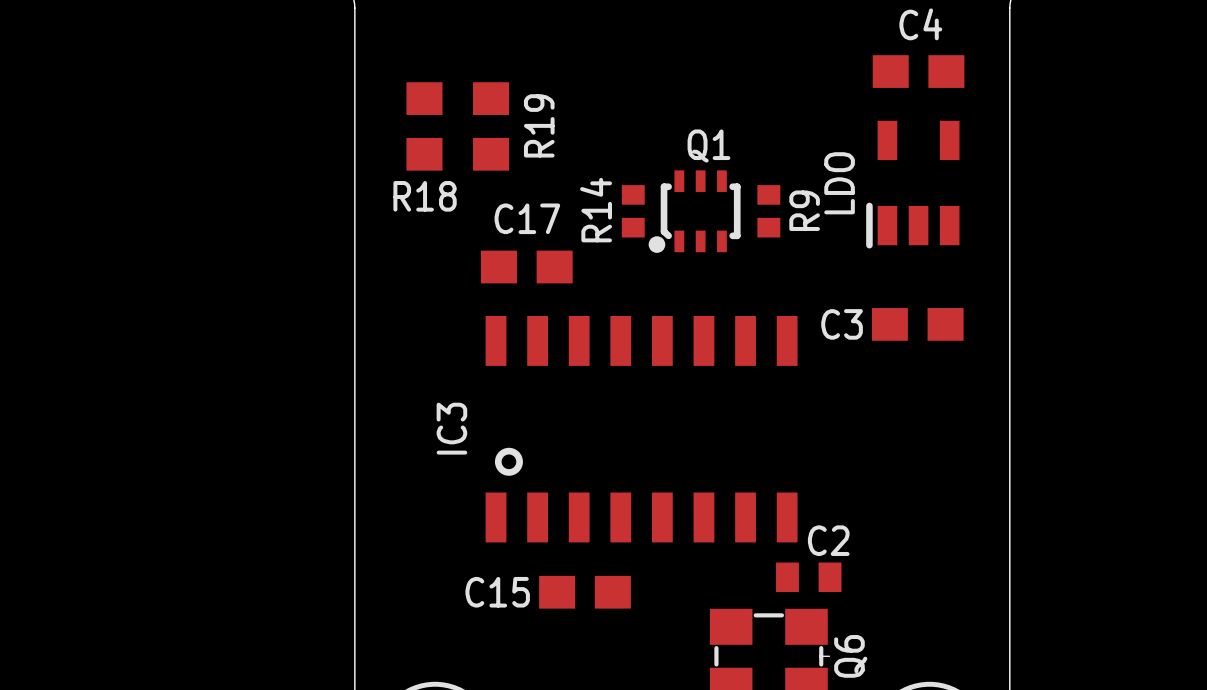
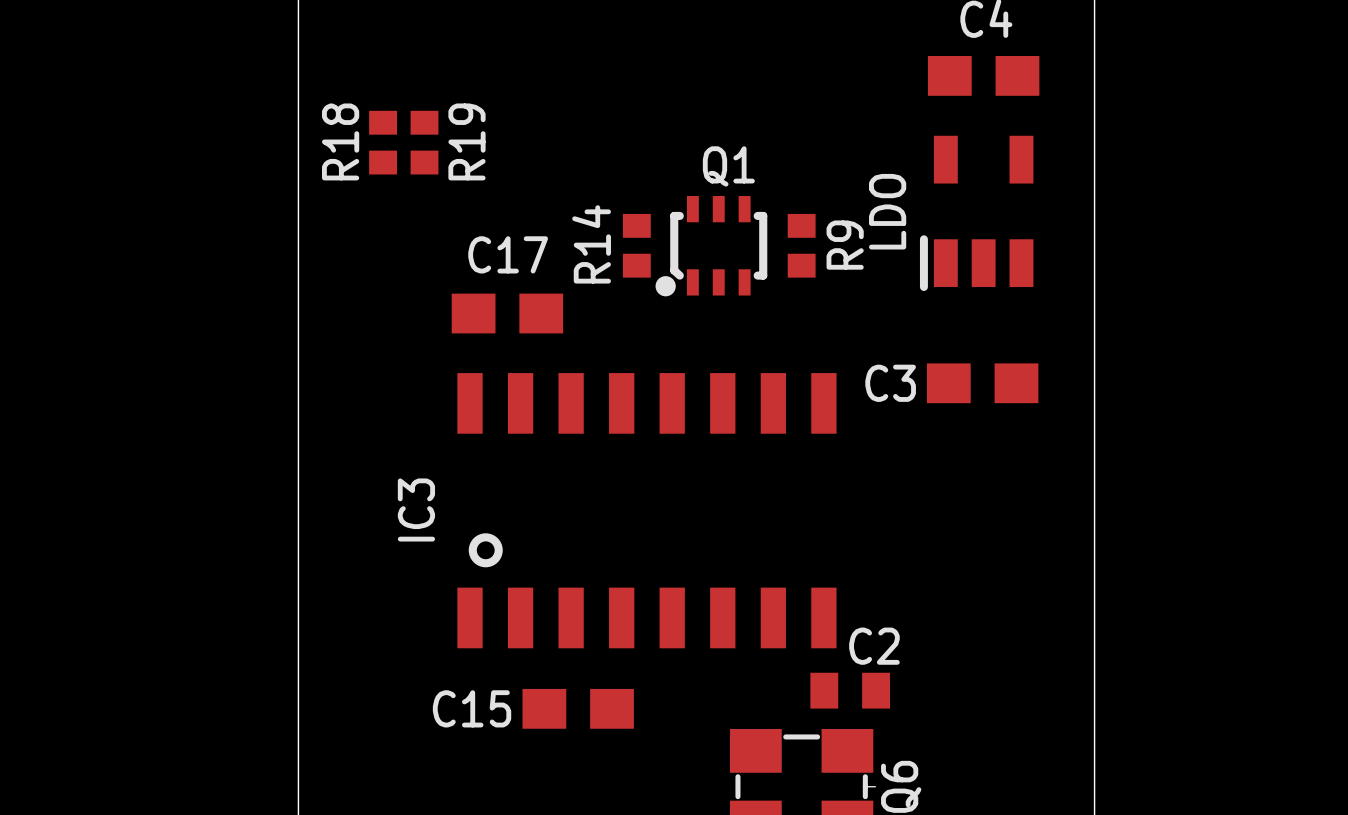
R18 footprint: [406, 82, 443, 171] -> [369, 110, 397, 175]
R19 footprint: [473, 82, 510, 171] -> [410, 110, 439, 175]
R18 name rotation: 0° (425, 196) -> 90° counterclockwise (340, 141)

